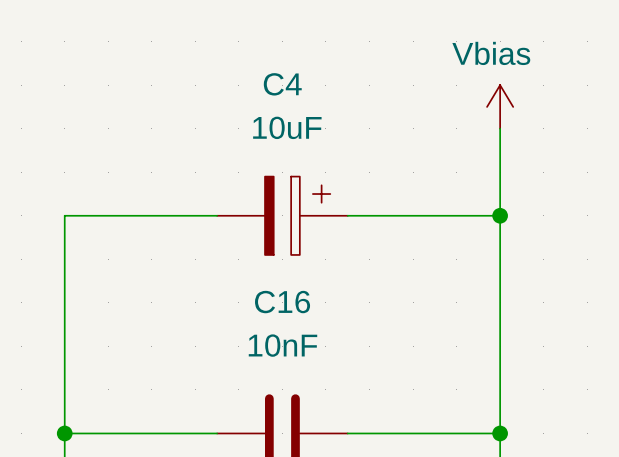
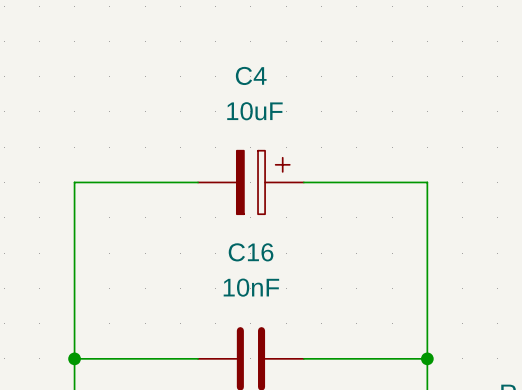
power symbol: Vbias (500, 106) -> none
wire: (500, 128) (500, 215) -> none
junction: (500, 215) -> none

